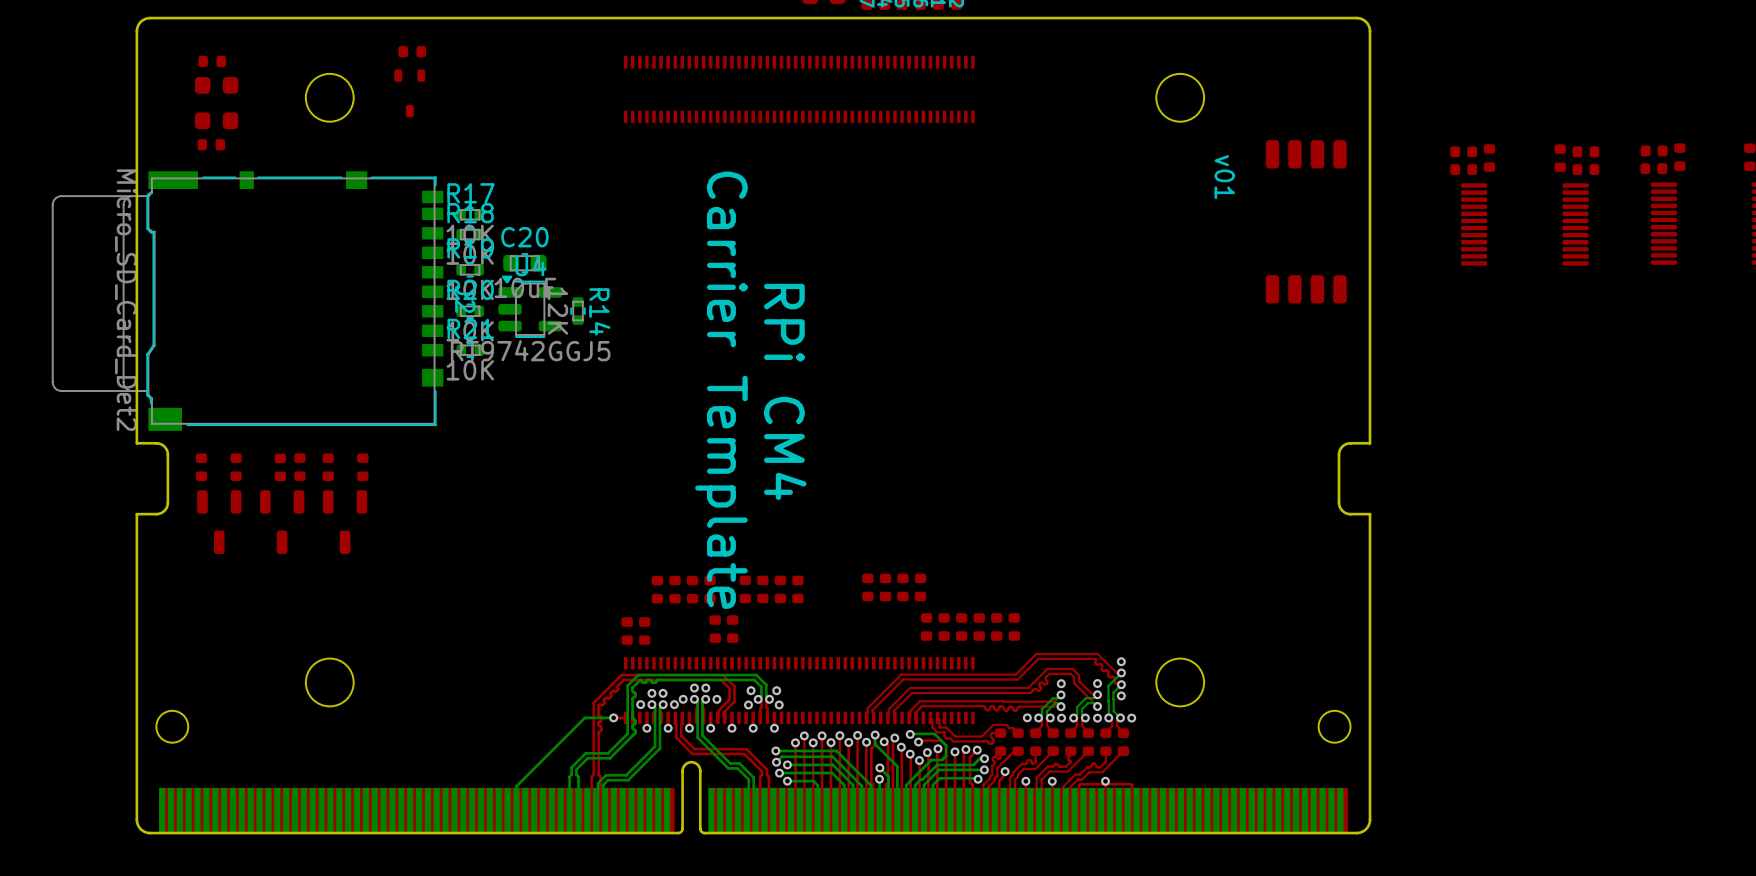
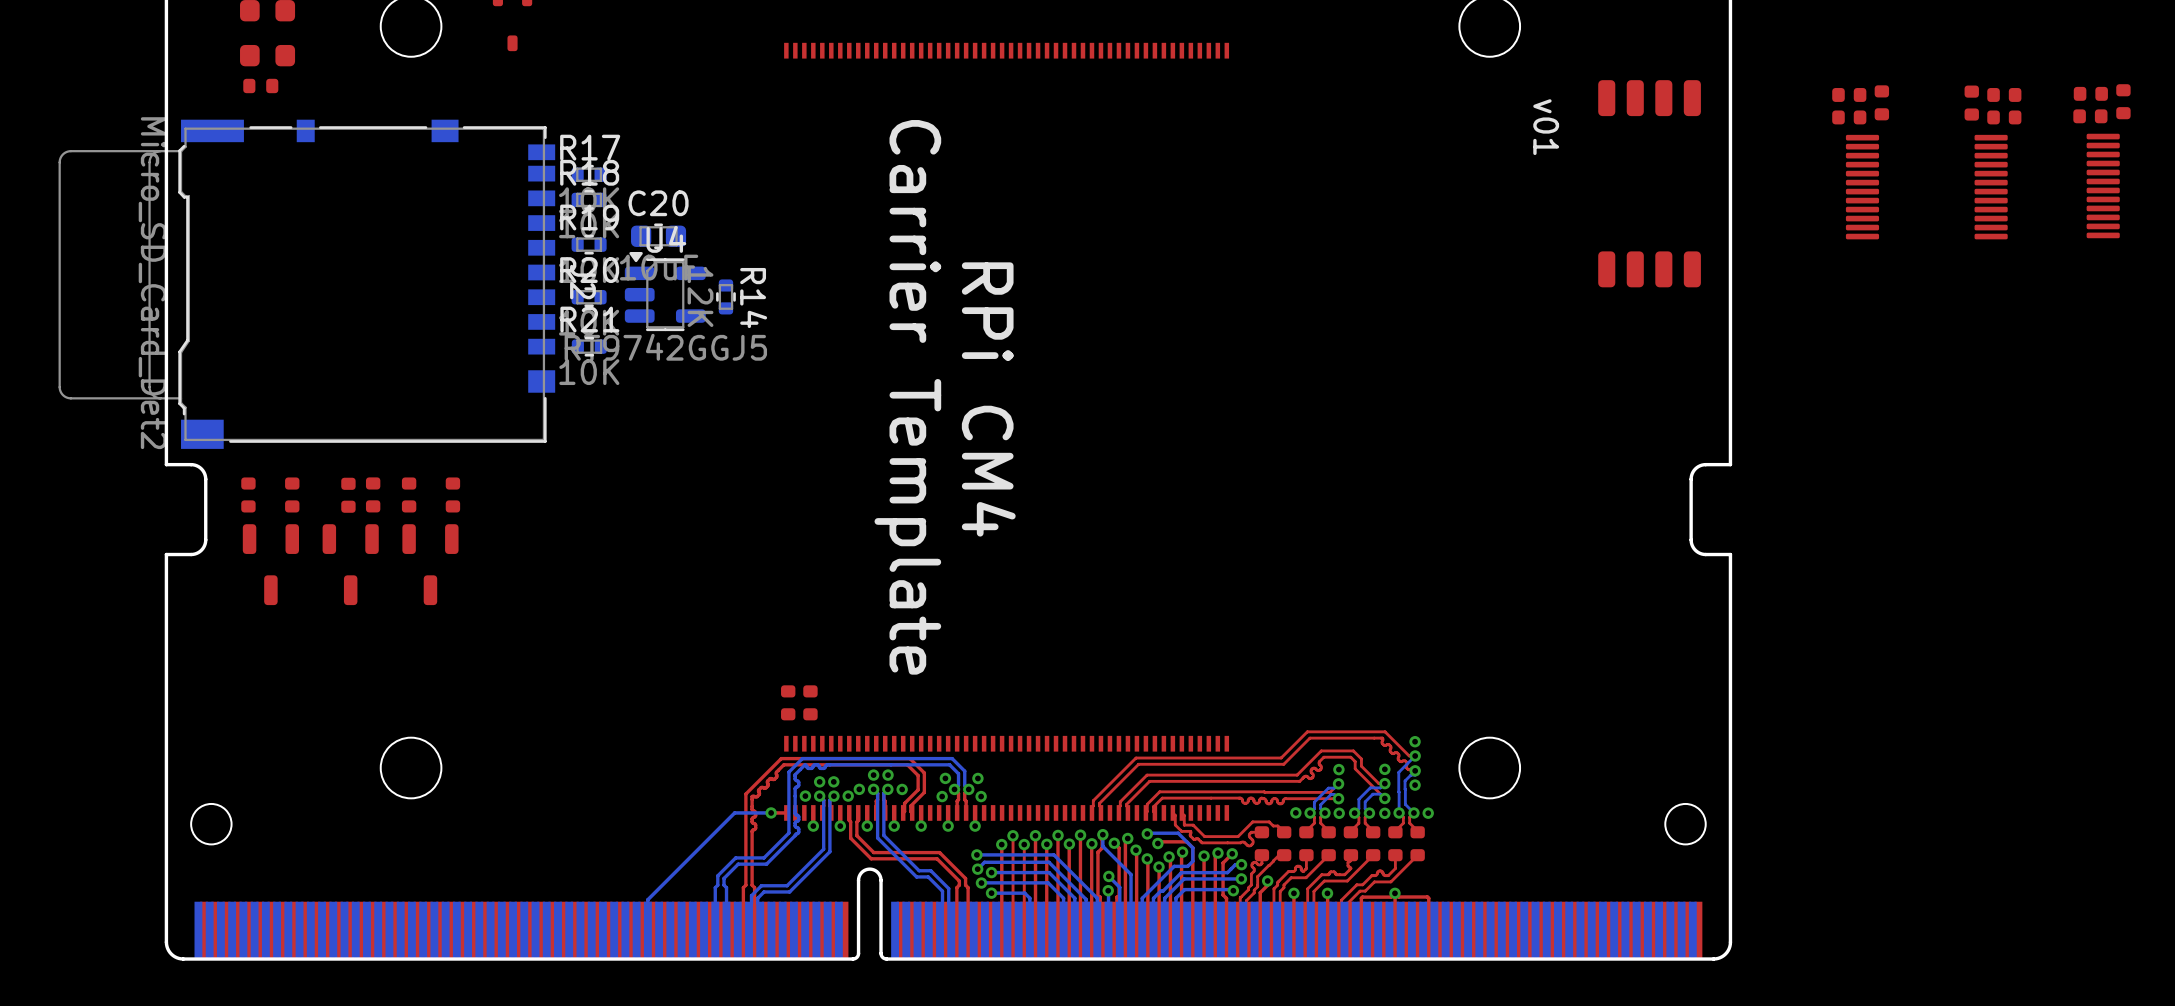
part: (867, 587) -> none
part: (885, 587) -> none
part: (902, 587) -> none
part: (920, 587) -> none
part: (657, 589) -> none
part: (674, 589) -> none
part: (692, 589) -> none
part: (710, 589) -> none
part: (745, 589) -> none
part: (762, 589) -> none
part: (780, 589) -> none
part: (797, 589) -> none
part: (926, 627) -> none
part: (944, 627) -> none
part: (961, 627) -> none
part: (979, 627) -> none
part: (996, 627) -> none
part: (1014, 627) -> none
part: (715, 629) -> none
part: (732, 629) -> none

